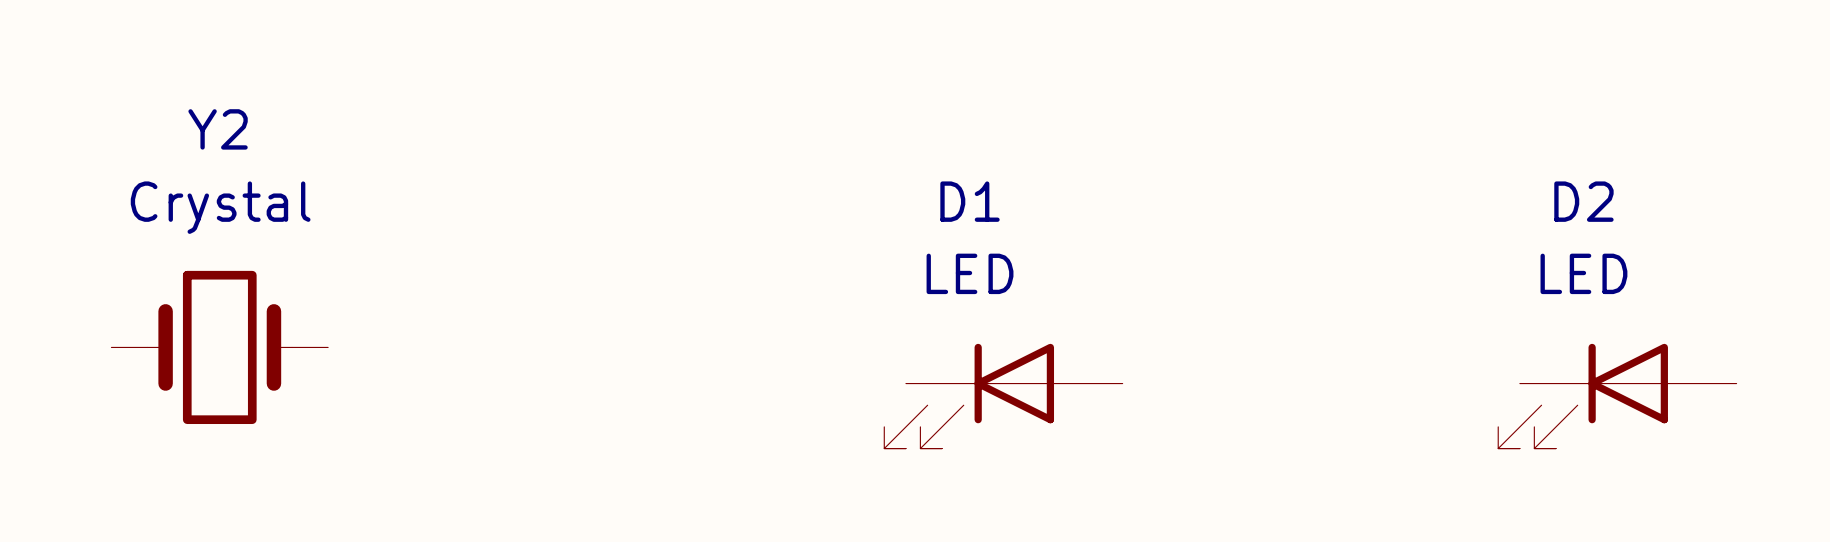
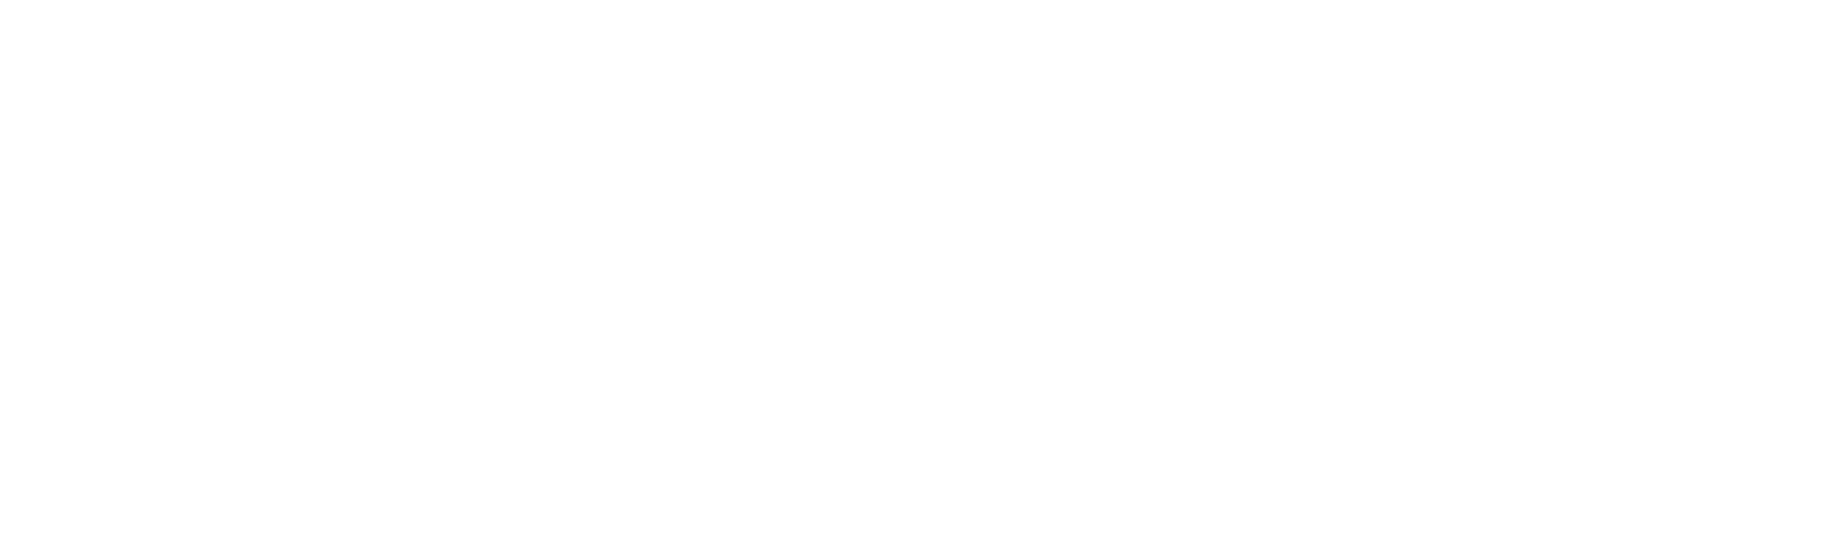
Y2: Crystal (219, 347) -> none
D1: LED (1003, 396) -> none
D2: LED (1617, 396) -> none

